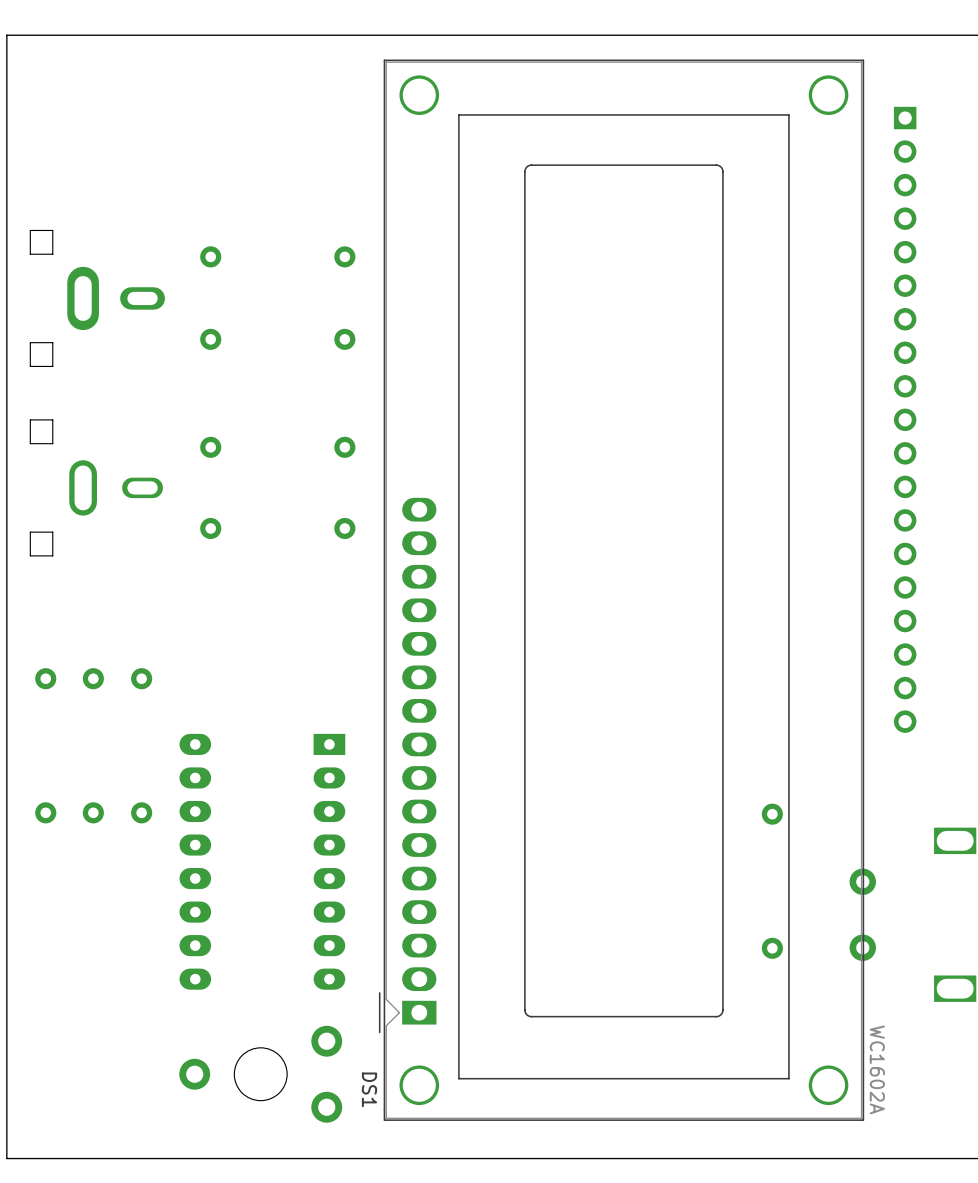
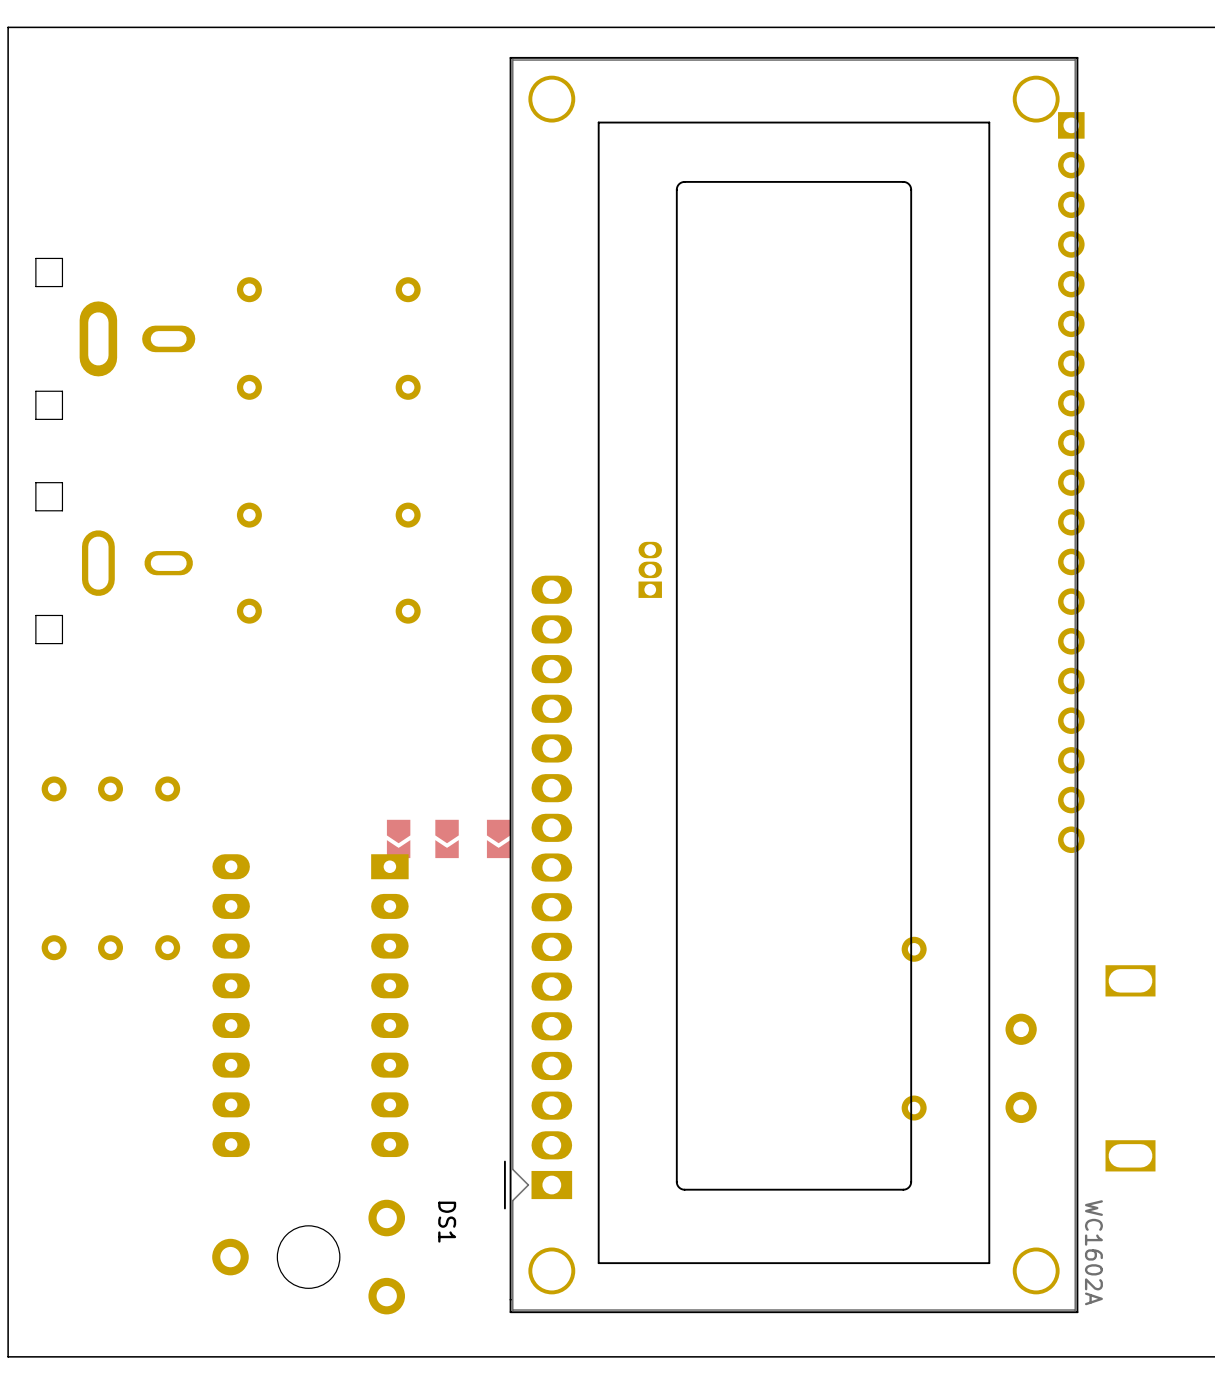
part: none -> (650, 569)
DS1 position: (621, 590) -> (791, 685)
part: none -> (398, 838)
part: none -> (447, 838)
part: none -> (498, 838)
DS1 name position: DS1 (369, 1089) -> DS1 (447, 1222)

